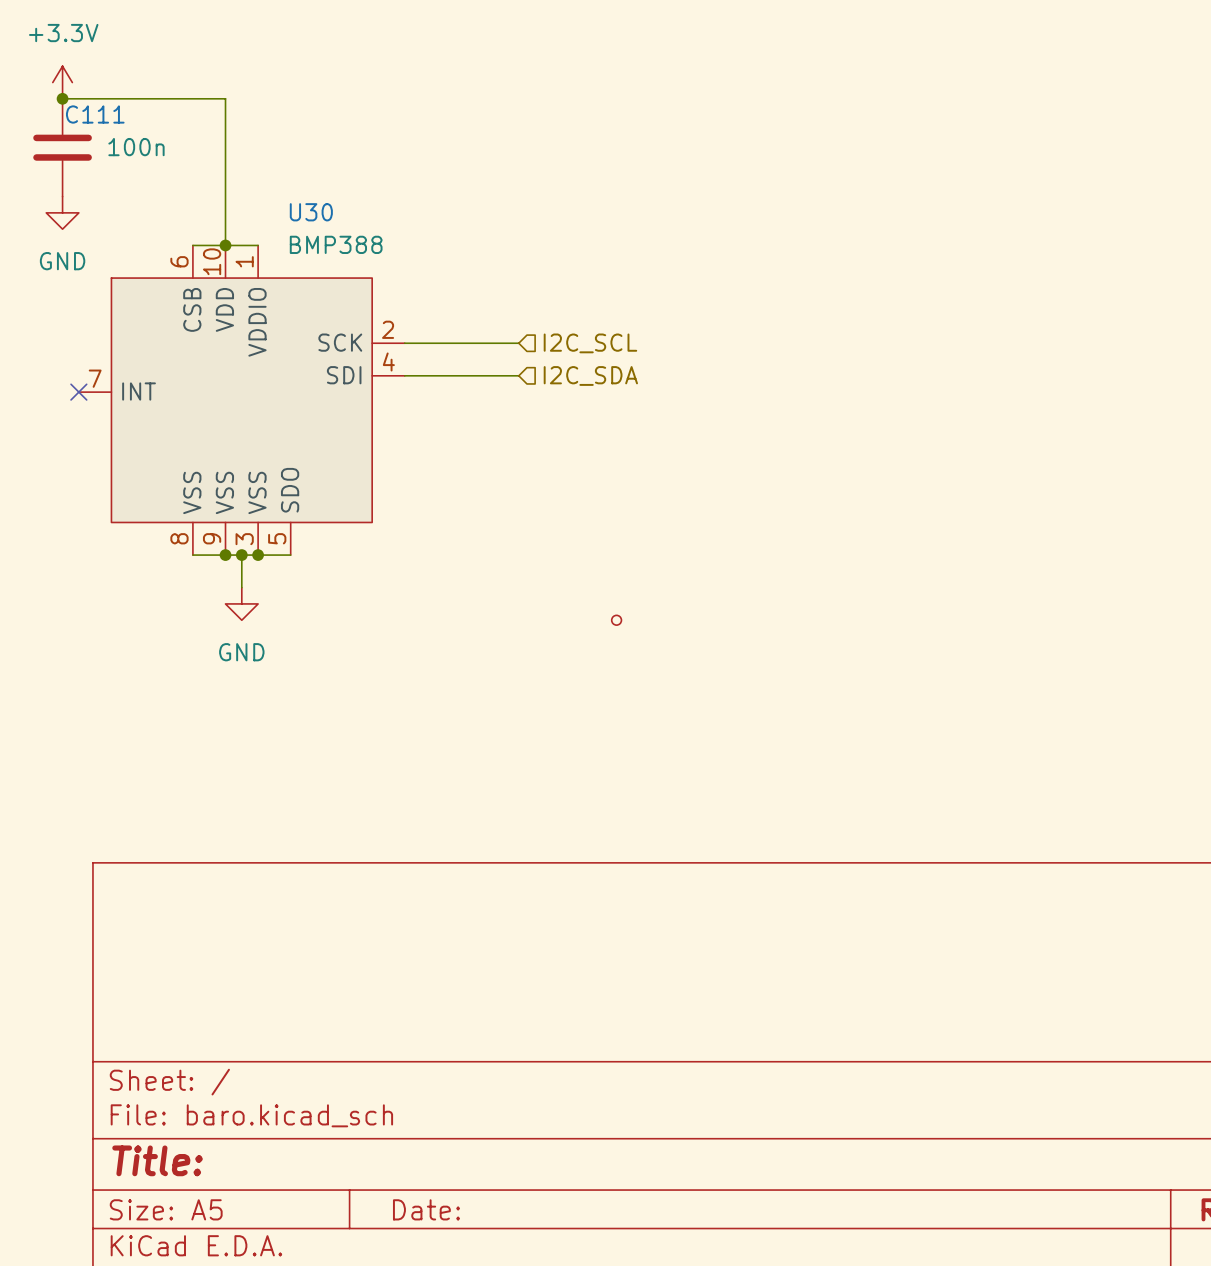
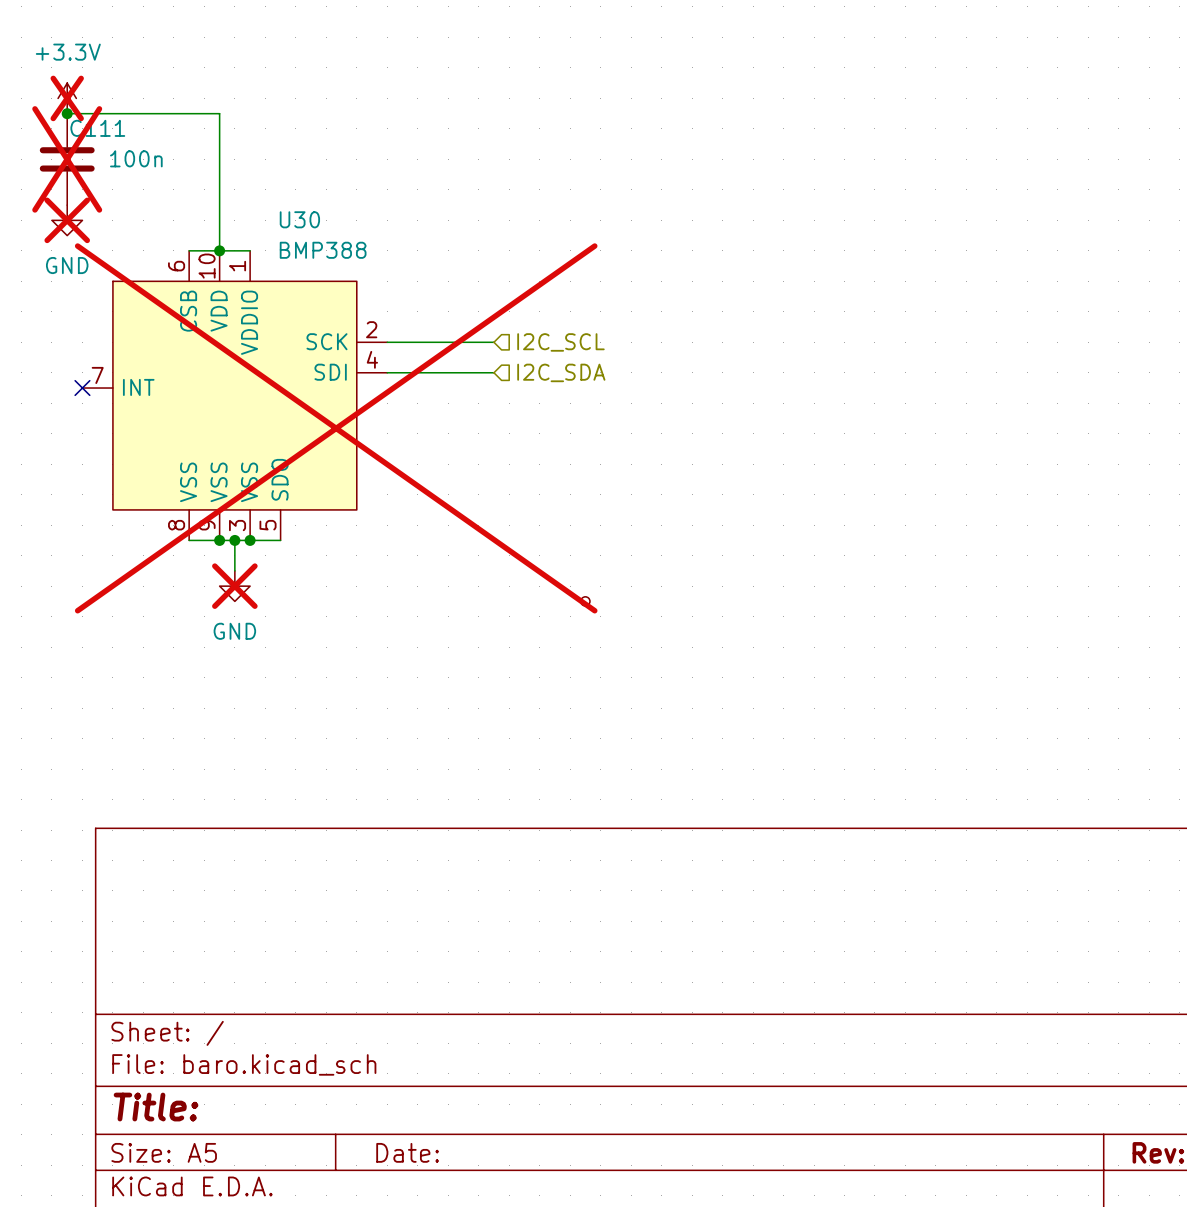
power symbol do-not-place cross: none -> (67, 98)
C111 do-not-place cross: none -> (67, 159)
power symbol do-not-place cross: none -> (67, 220)
U30 do-not-place cross: none -> (336, 428)
power symbol do-not-place cross: none -> (234, 586)

